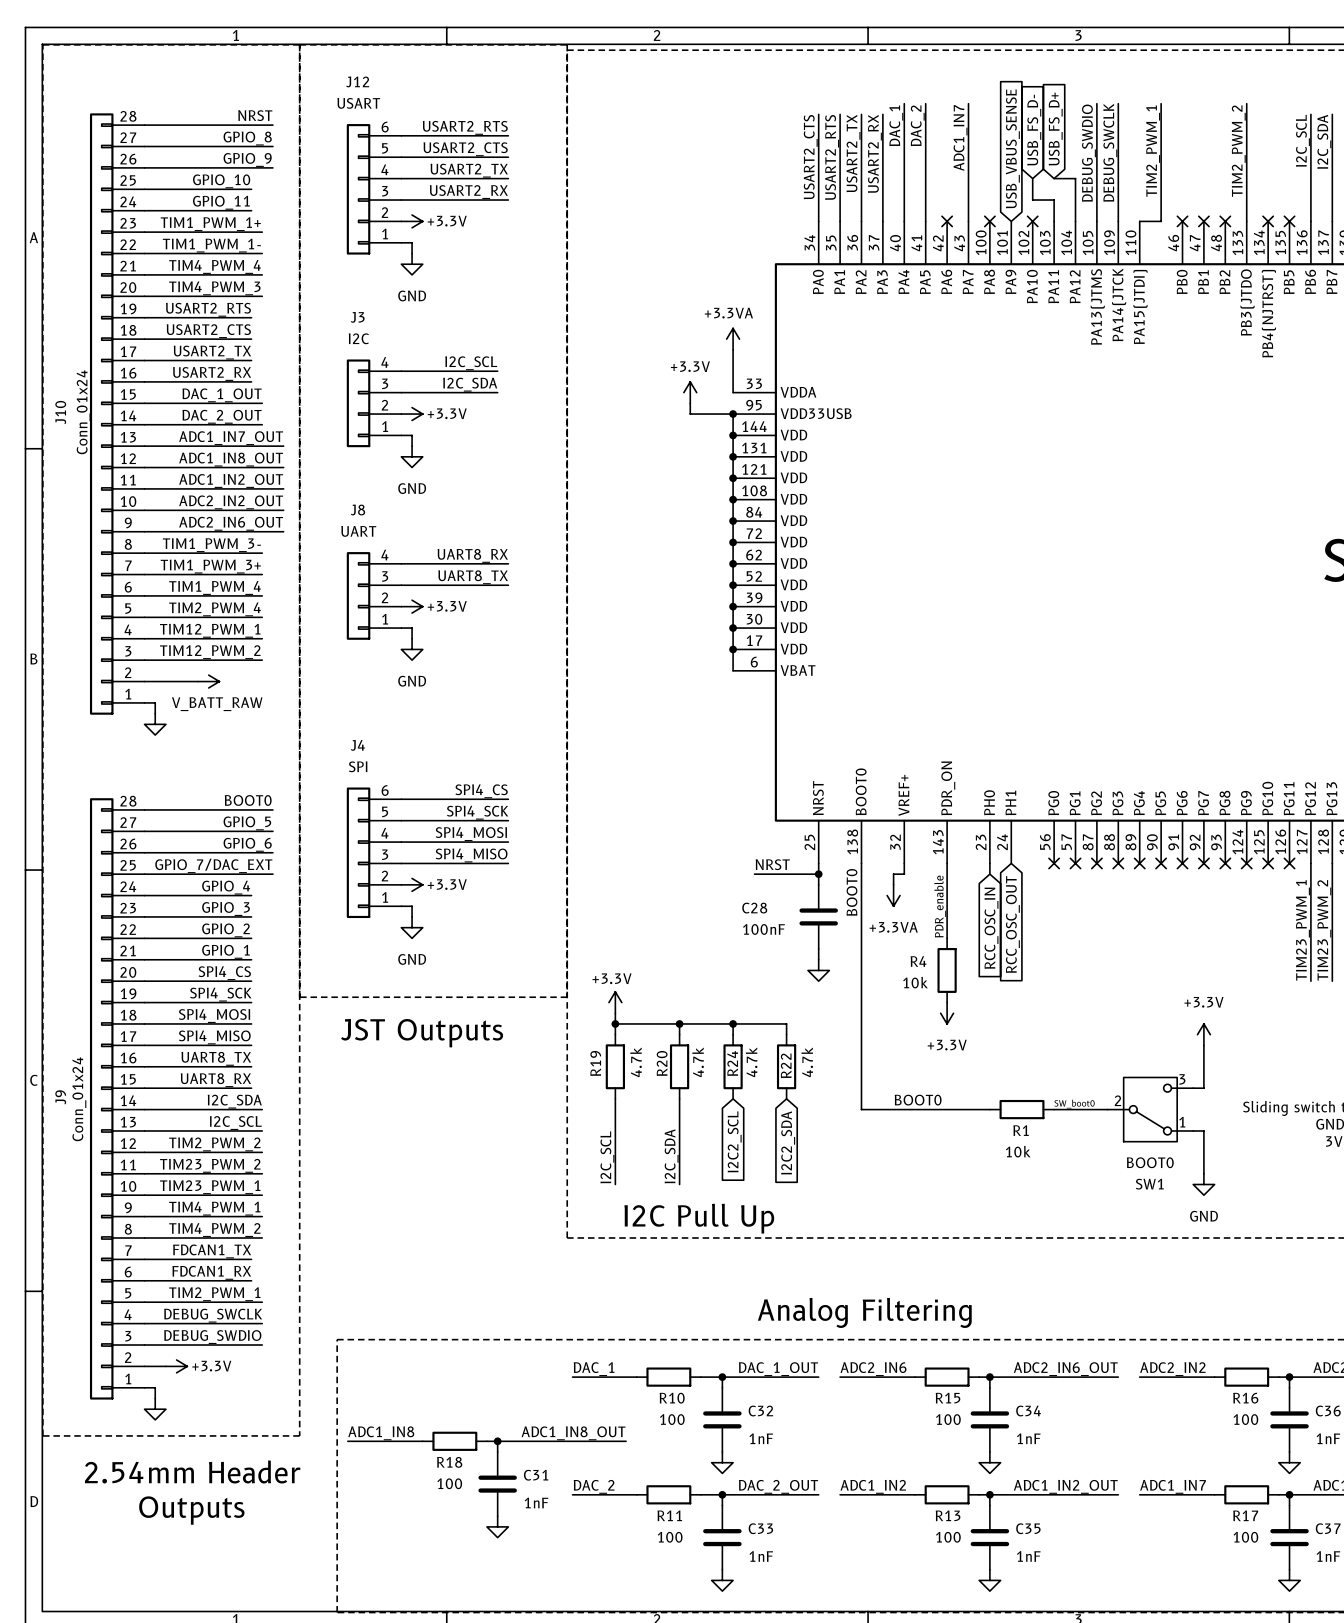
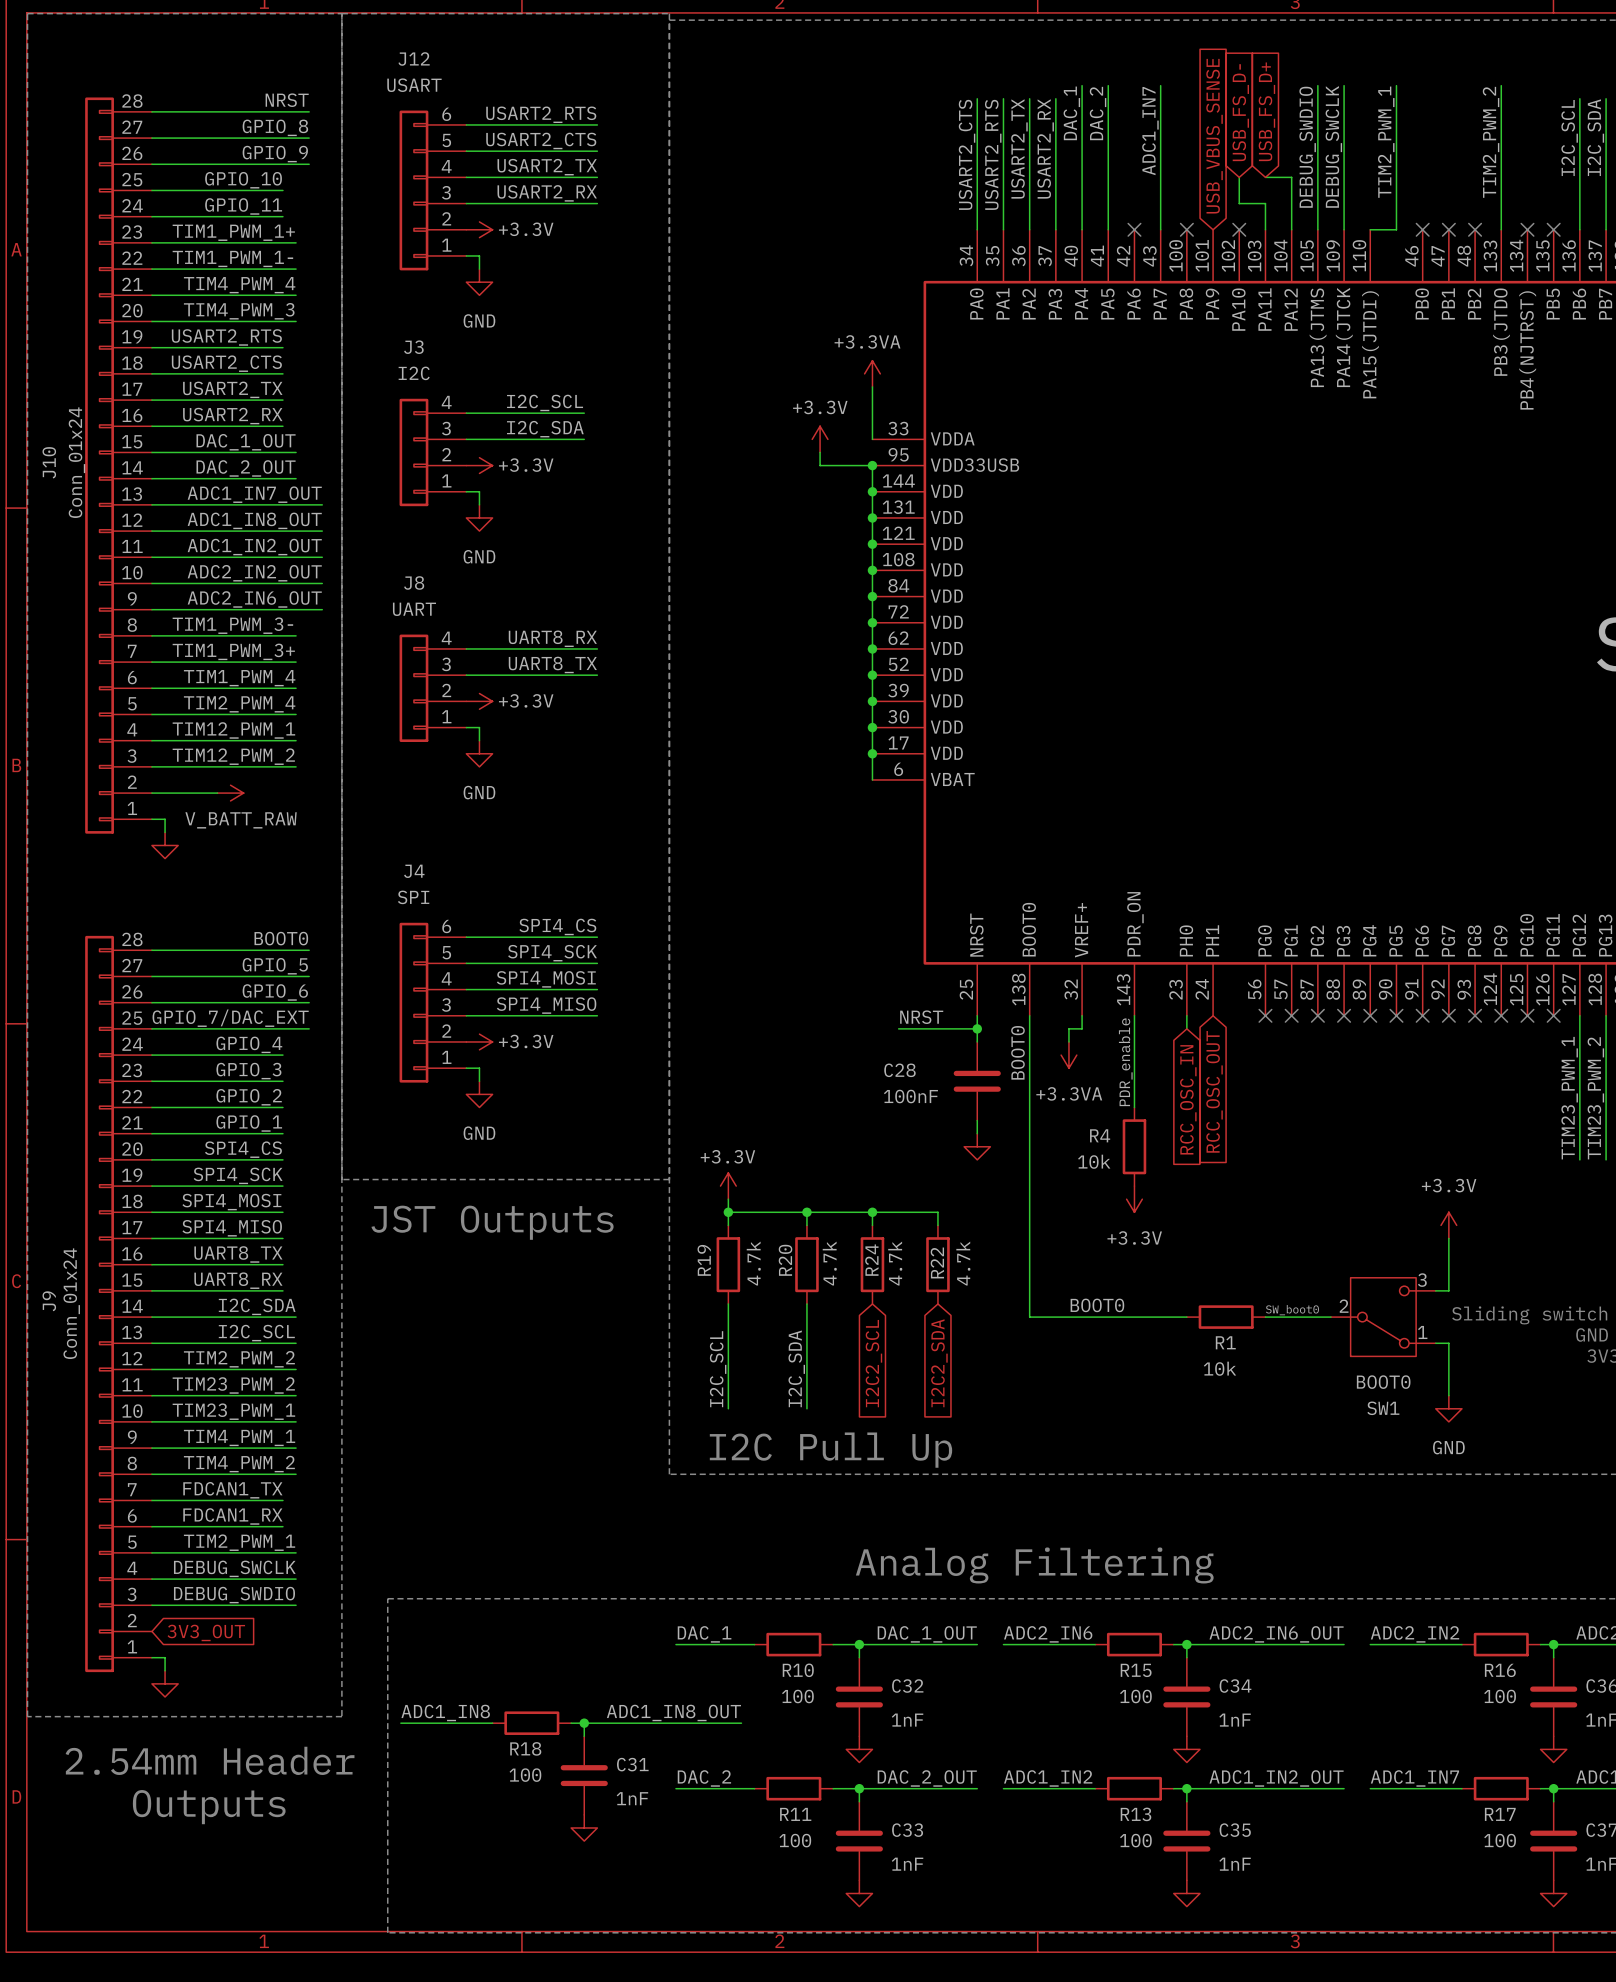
wire: (144, 1366) (165, 1366) -> none
power symbol: +3.3V (176, 1366) -> none
global label: none -> 3V3_OUT (206, 1632)

